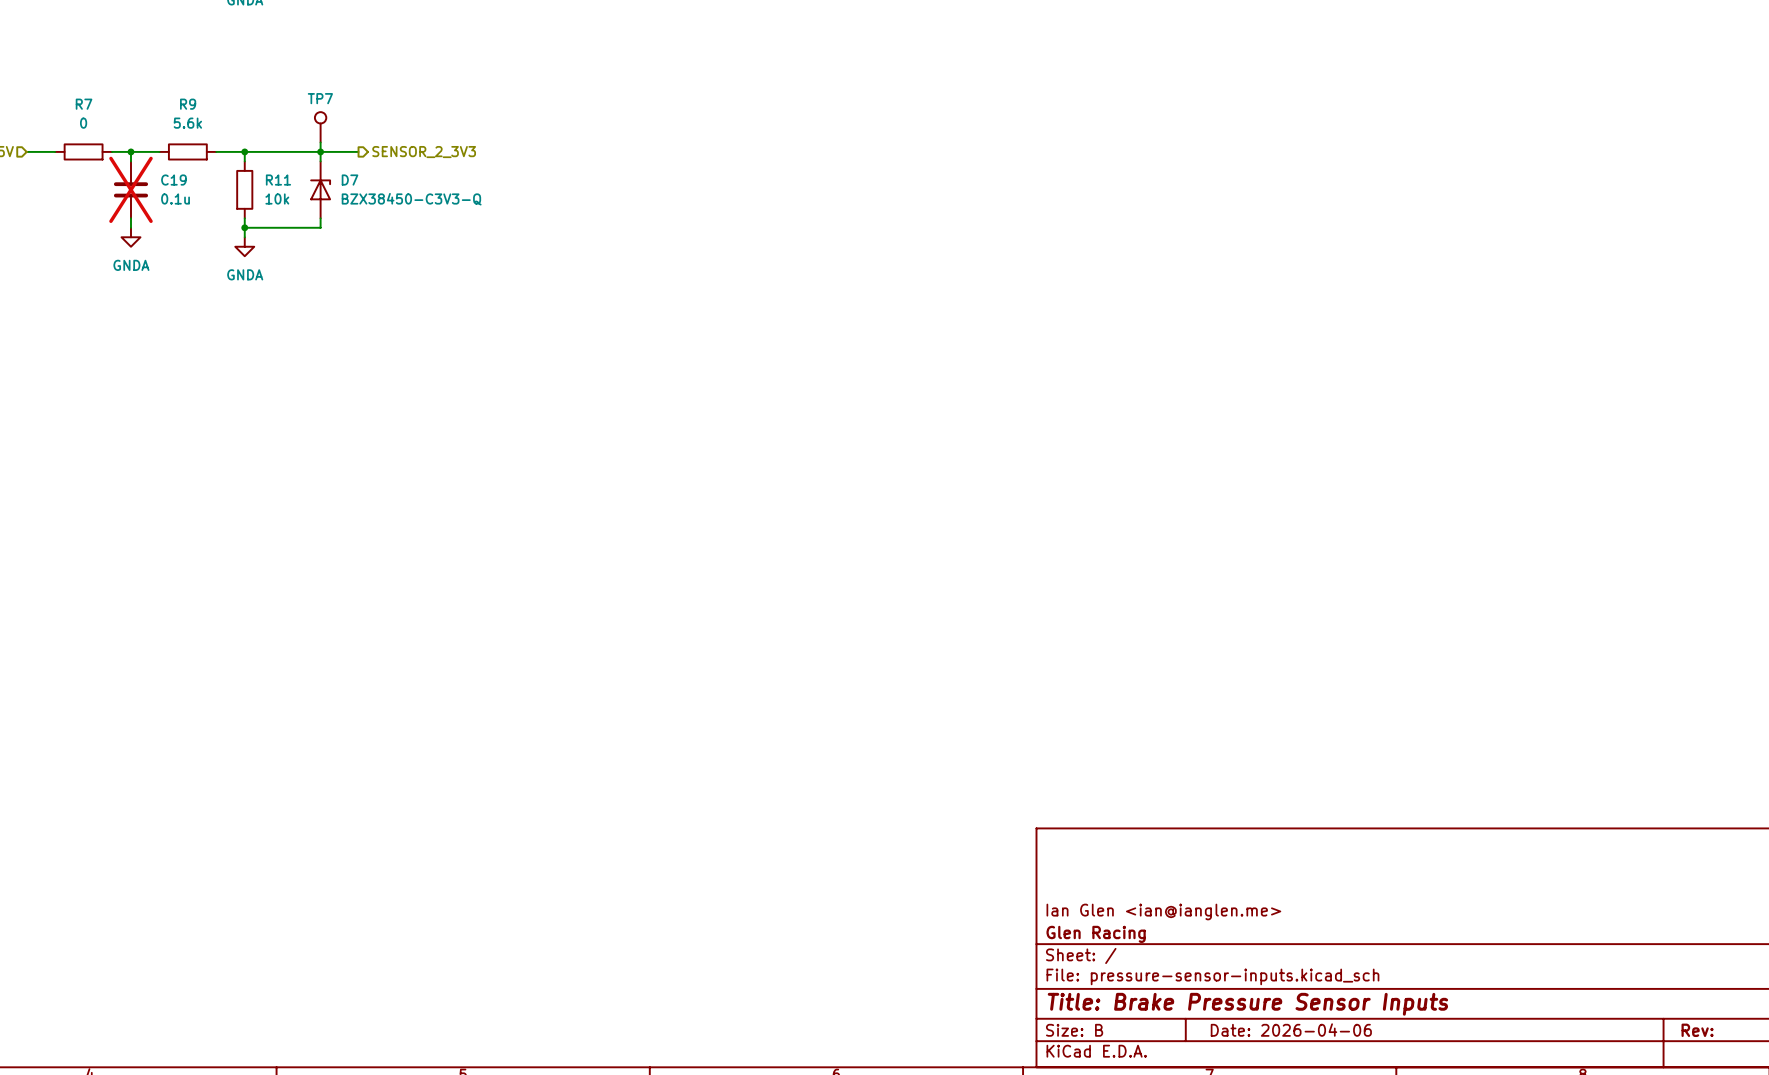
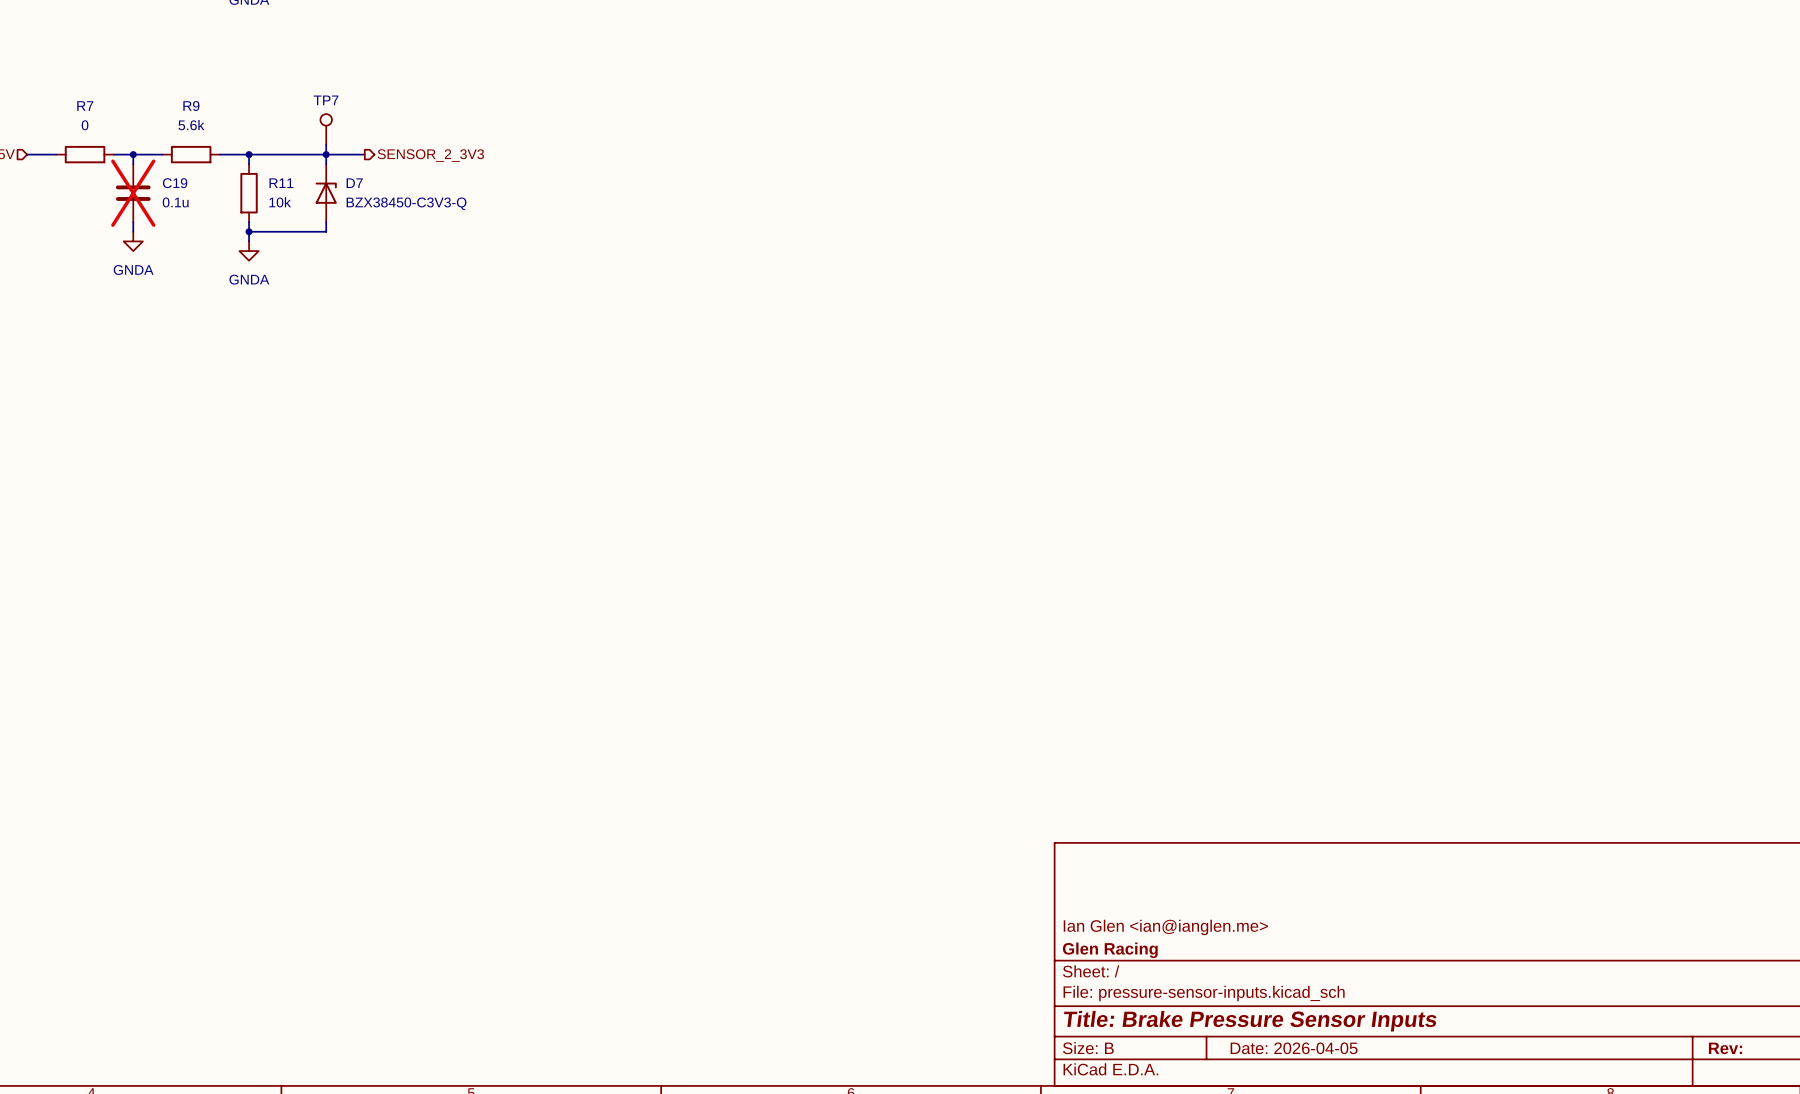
title block: Date: 2026-04-06 (1291, 1030) -> Date: 2026-04-05 (1294, 1048)

